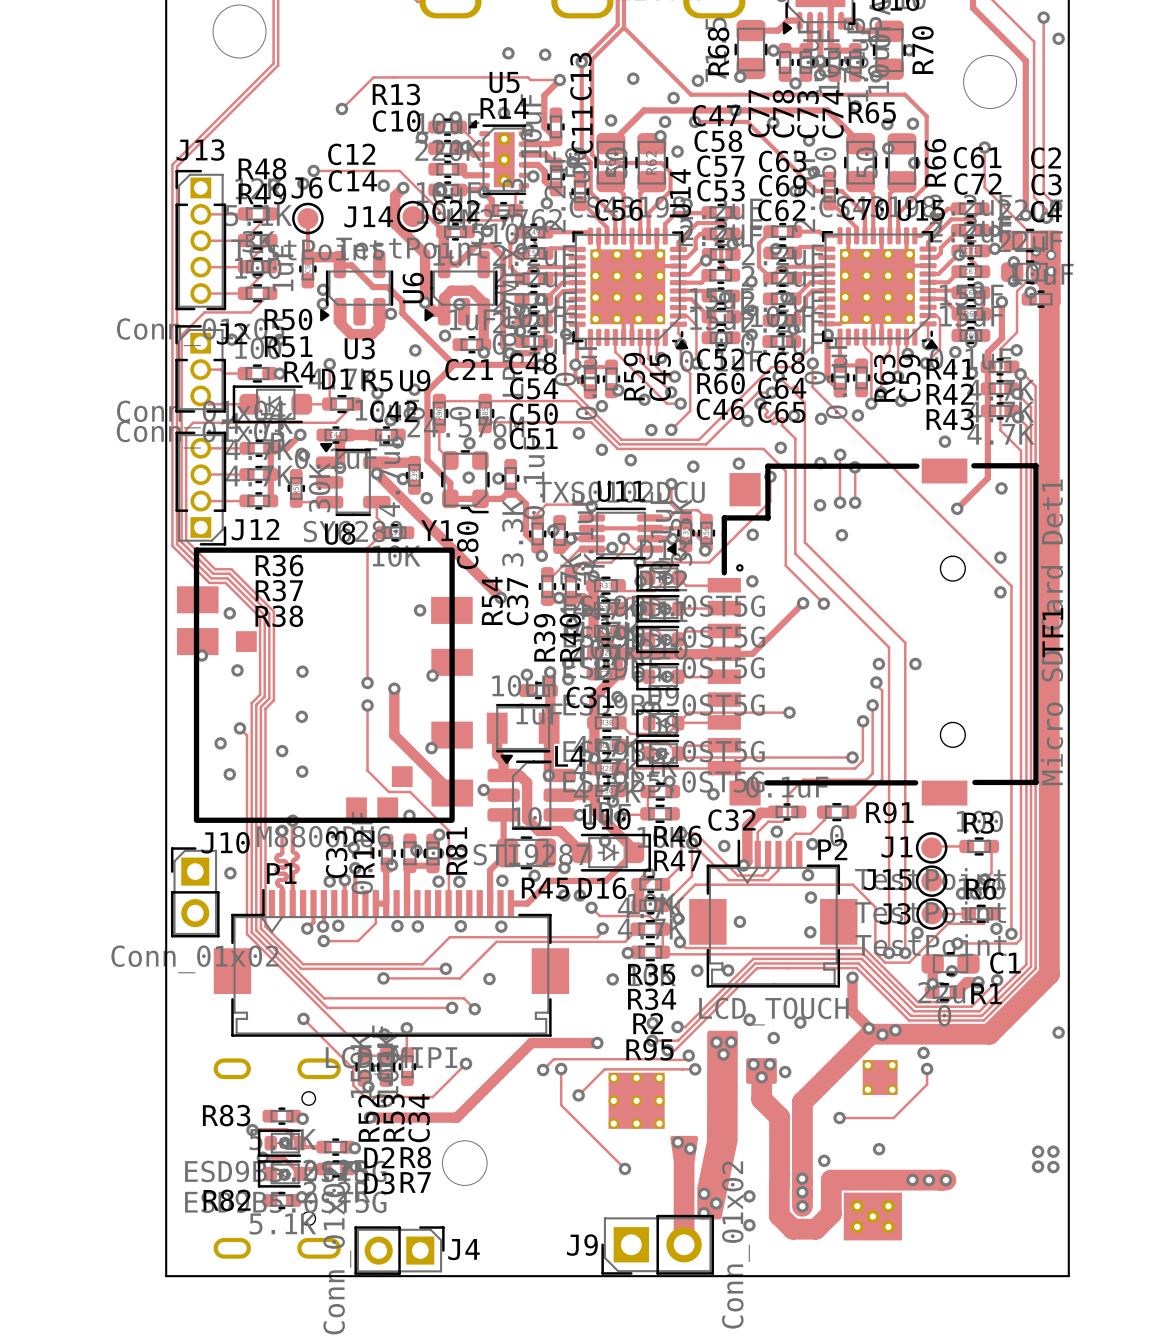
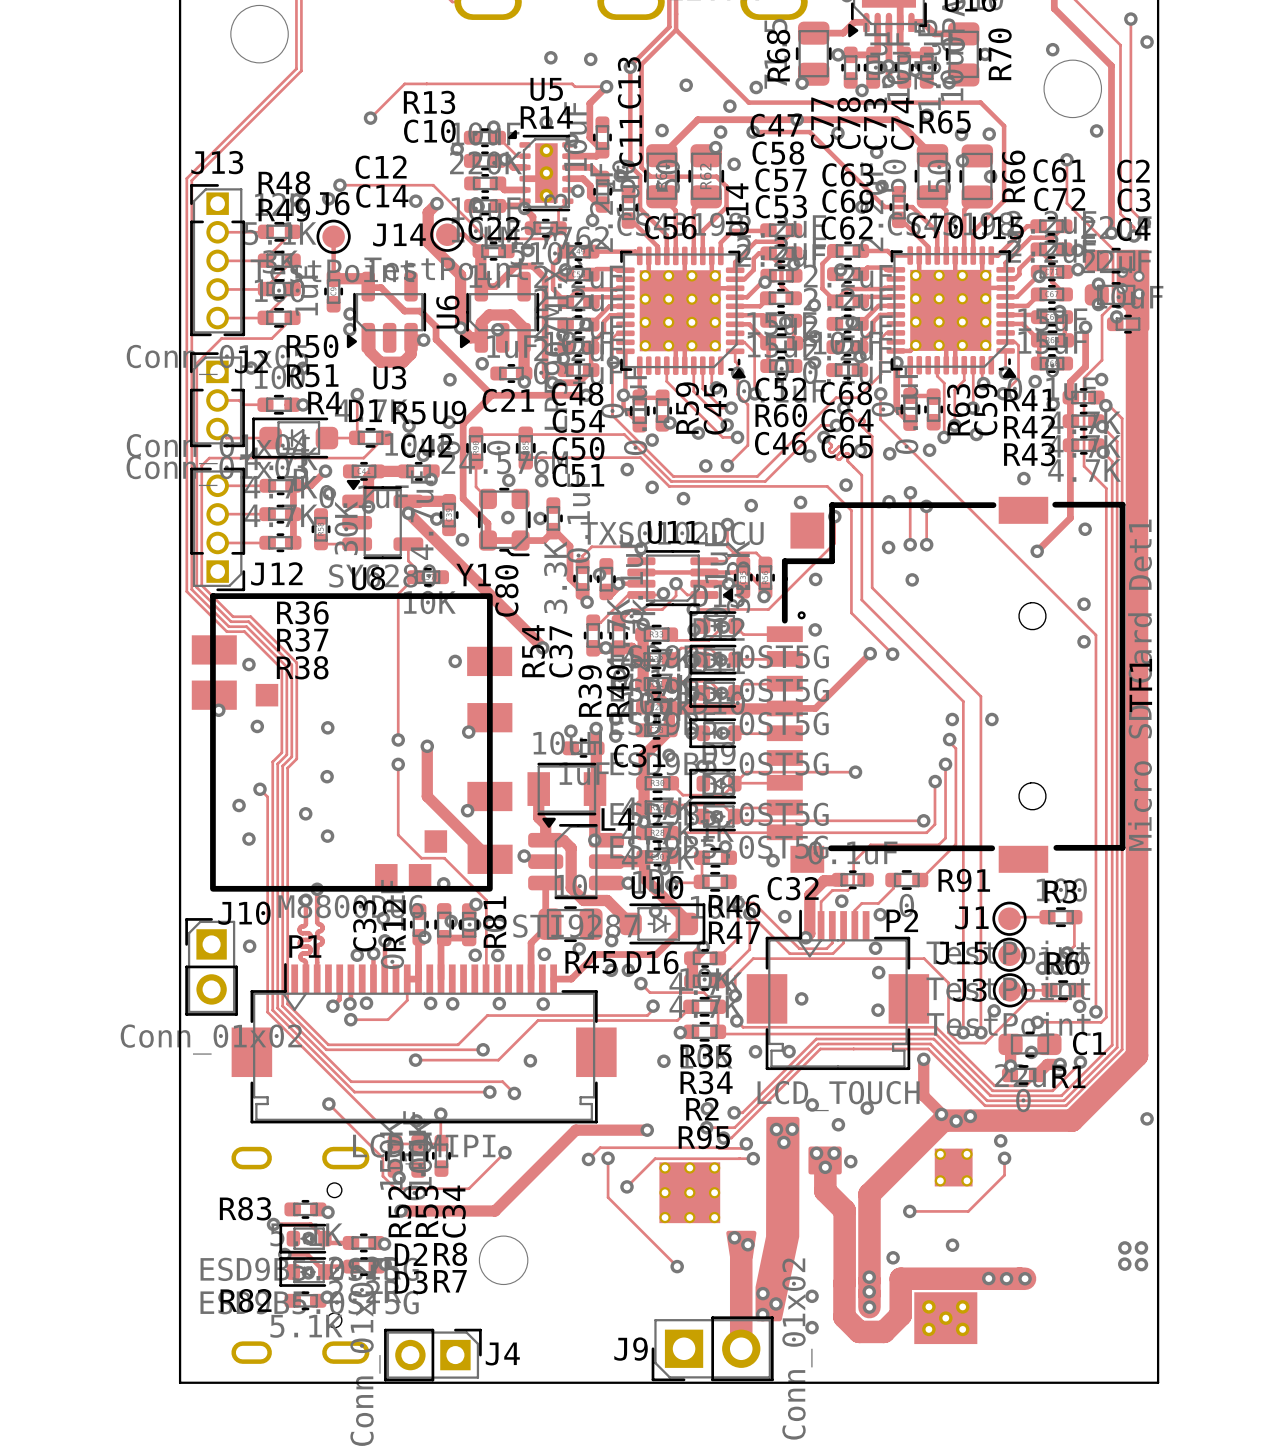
via: none -> (1052, 49)
via: none -> (1096, 130)

